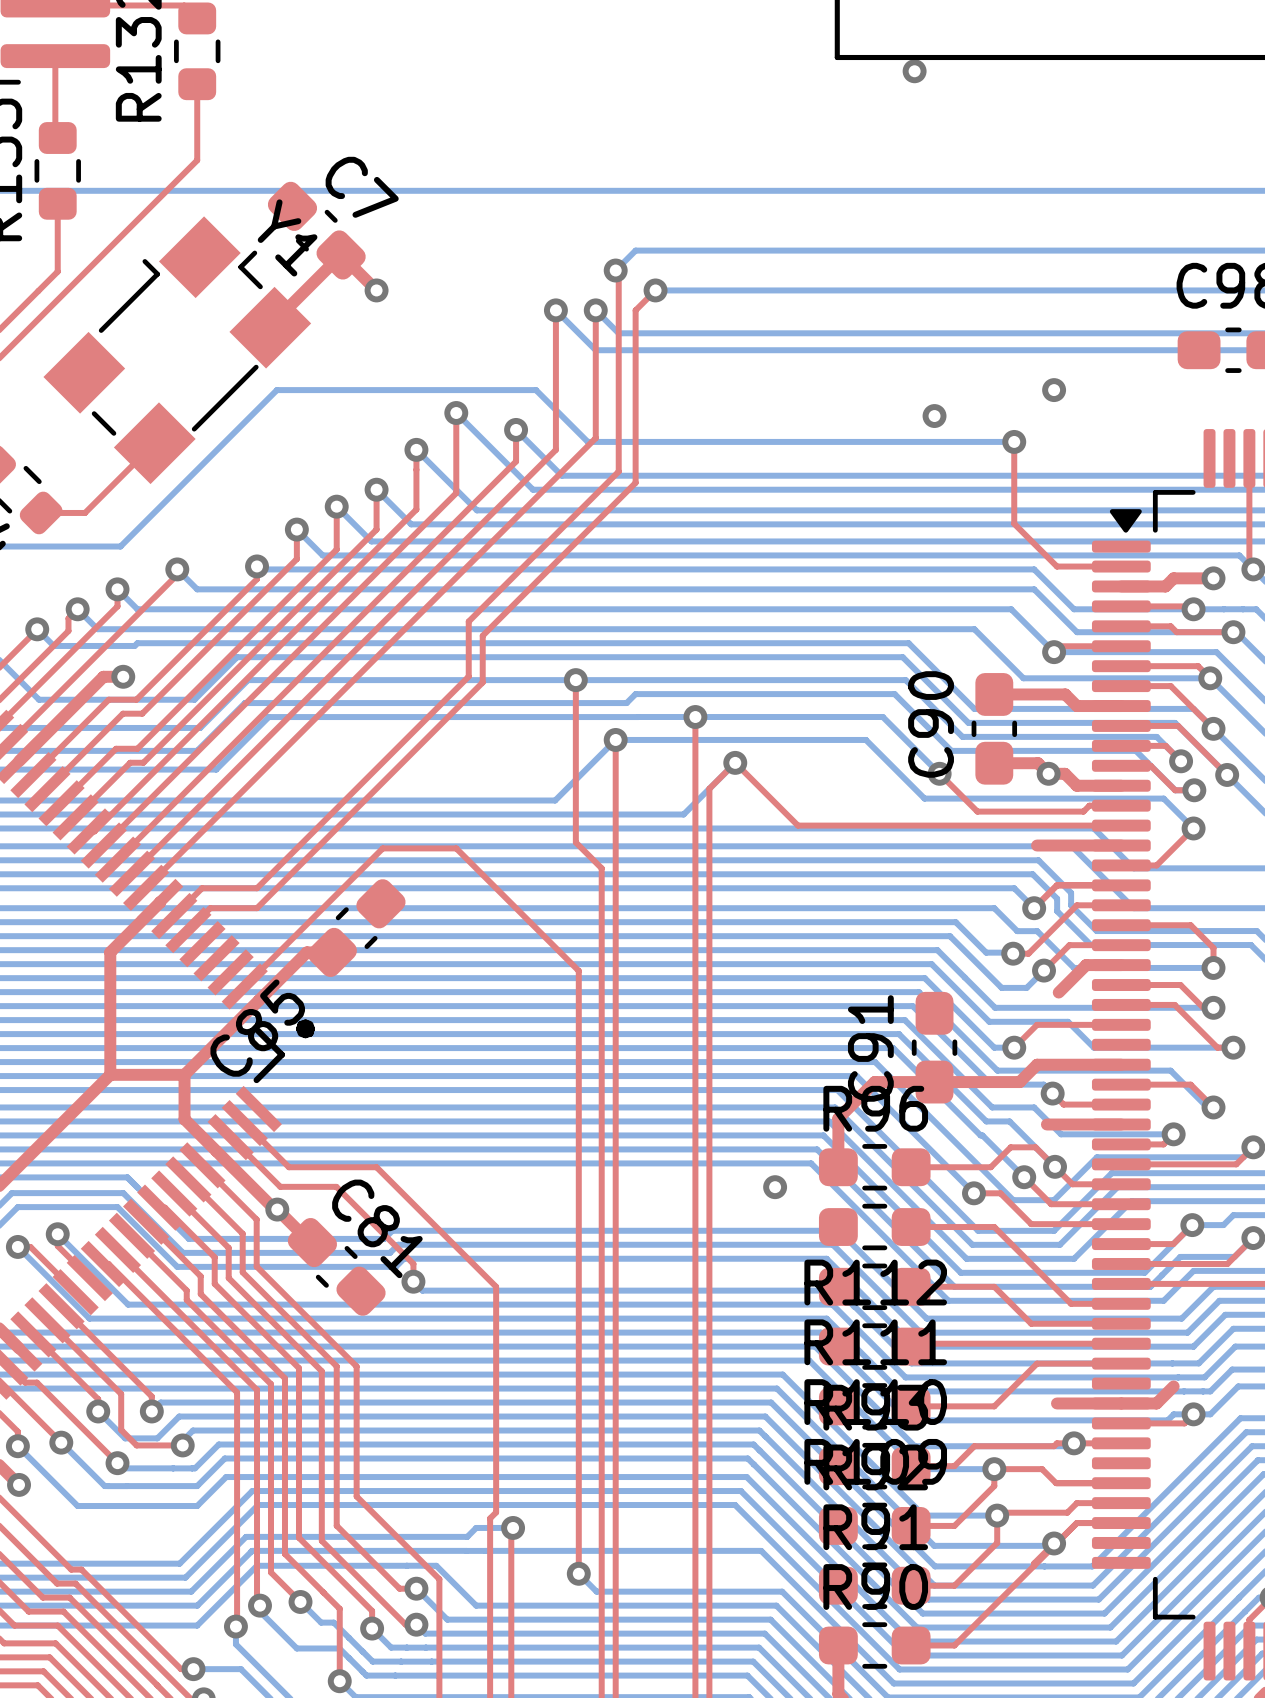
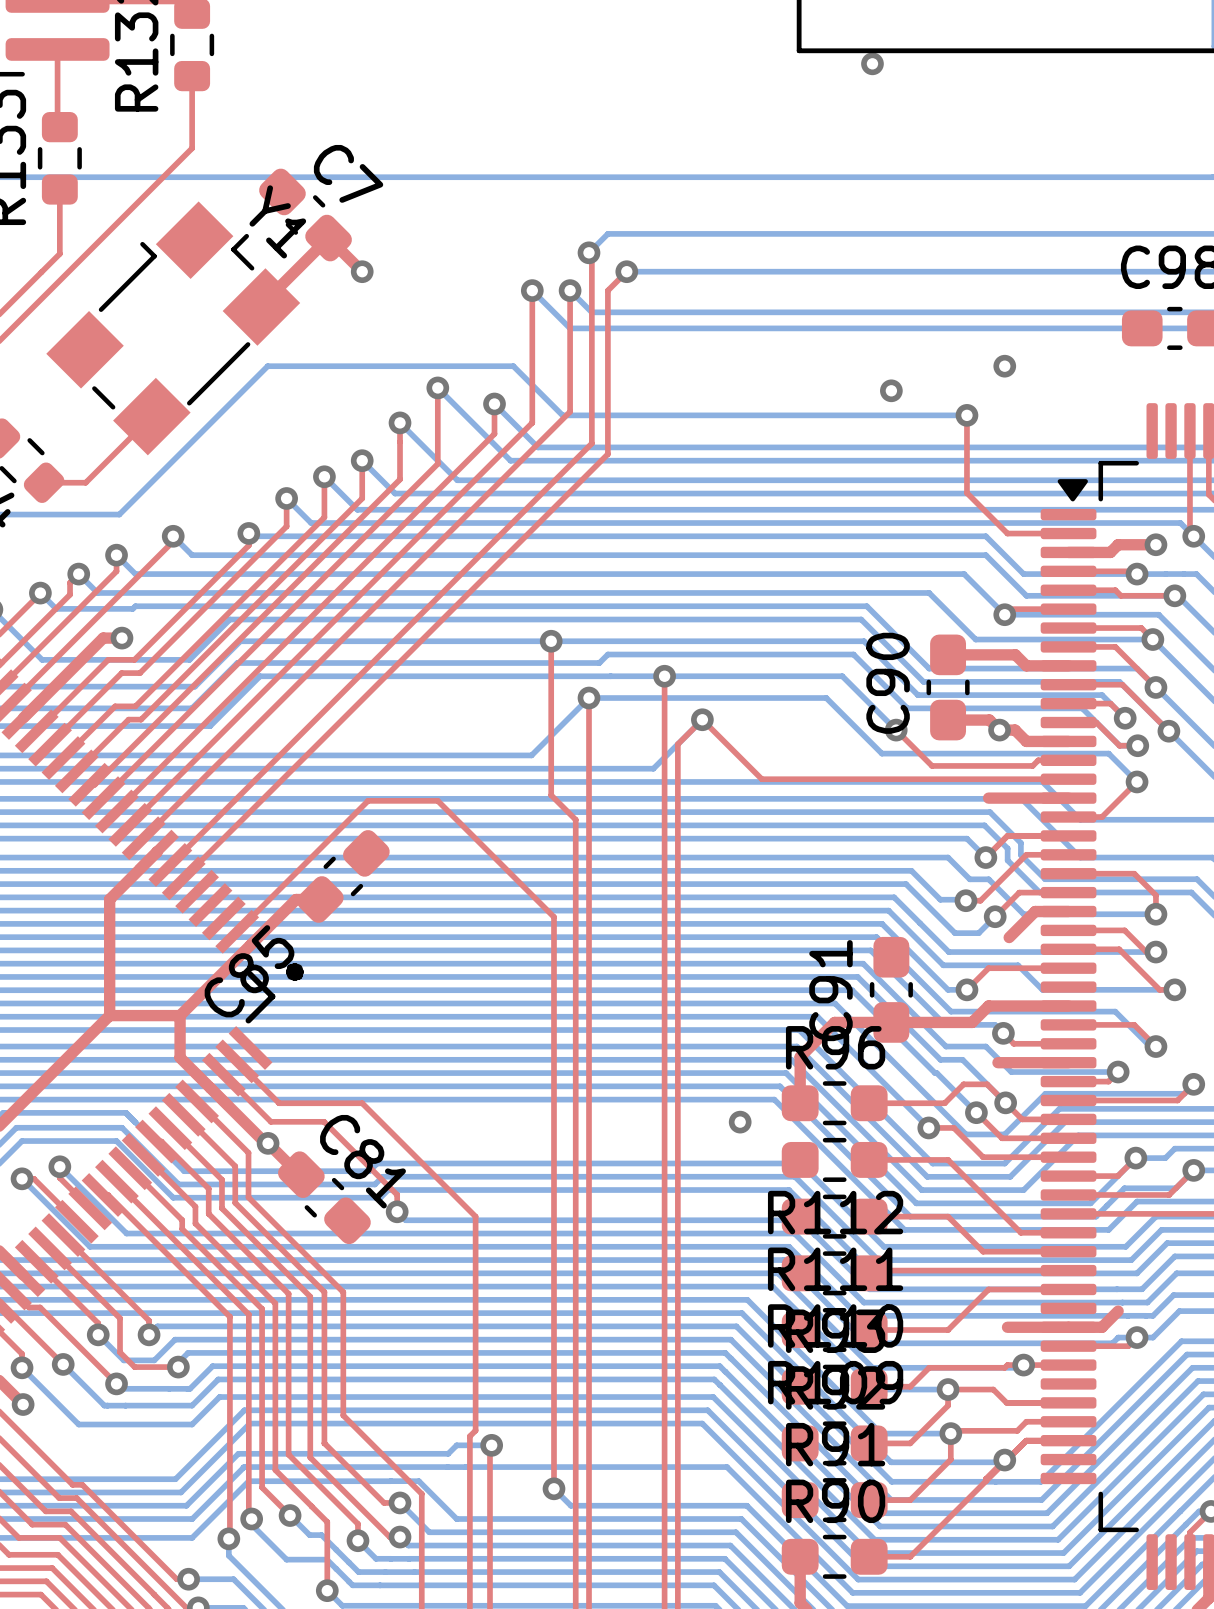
top track: (468, 621) (468, 676) (257, 888) (202, 888) -> (449, 585) (196, 838)
top track: (482, 635) (482, 682) (257, 908) (210, 908) -> (462, 599) (204, 857)

